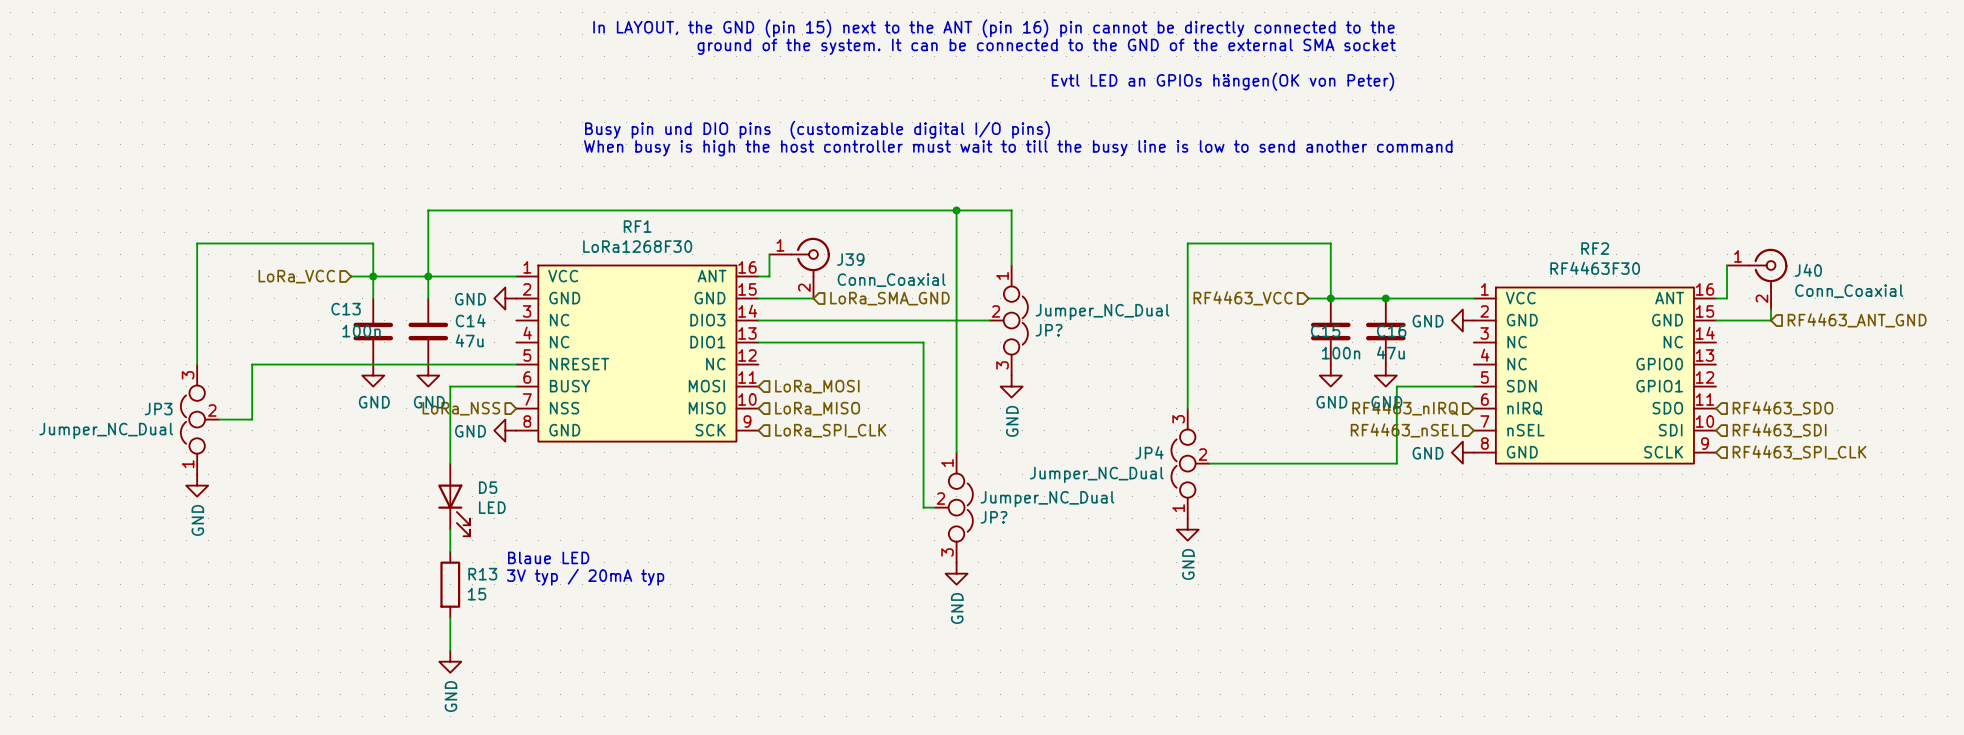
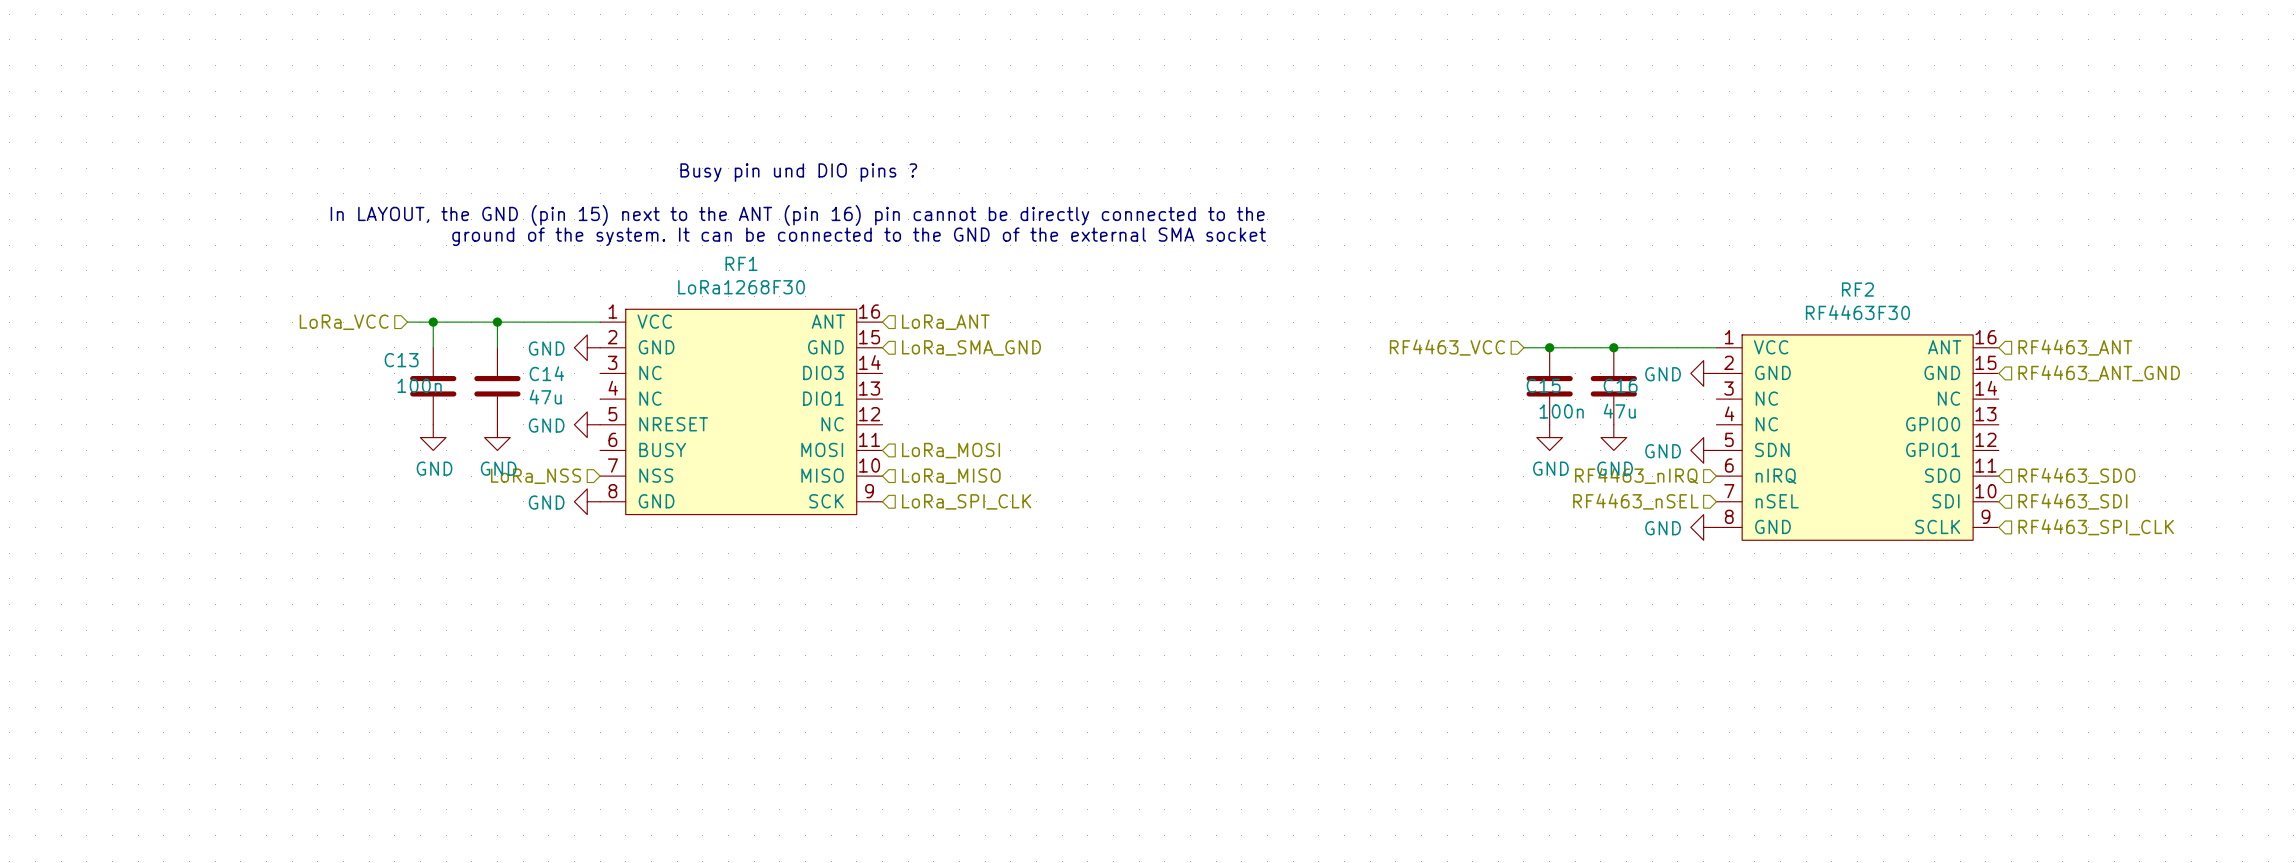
text: In LAYOUT, the GND (pin 15) next to the ANT (pin 16) pin cannot be directly connected to the (993, 28) -> none
text: ground of the system. It can be connected to the GND of the external SMA socket (1046, 46) -> none
text: Evtl LED an GPIOs hängen(OK von Peter) (1223, 81) -> none
text: Busy pin und DIO pins (customizable digital I/O pins) (817, 130) -> none
text: When busy is high the host controller must wait to till the busy line is low to send another command (1018, 148) -> Busy pin und DIO pins ? (798, 172)
text: none -> In LAYOUT, the GND (pin 15) next to the ANT (pin 16) pin cannot be directly connected to the (797, 215)
text: none -> ground of the system. It can be connected to the GND of the external SMA socket (859, 236)
wire: (956, 210) (956, 452) -> none
junction: (956, 210) -> none
wire: (769, 254) (769, 276) (758, 276) -> none
wire: (1011, 265) (1011, 210) (428, 210) (428, 276) -> none
wire: (1727, 265) (1727, 298) (1716, 298) -> none
J39: Conn_Coaxial (799, 268) -> none
wire: (373, 276) (373, 243) (197, 243) (197, 364) -> none
hierarchical label: none -> LoRa_ANT (945, 322)
J40: Conn_Coaxial (1757, 279) -> none
wire: (758, 298) (813, 298) -> none
hierarchical label position: LoRa_SMA_GND (889, 298) -> LoRa_SMA_GND (971, 347)
wire: (1330, 298) (1330, 243) (1187, 243) (1187, 408) -> none
hierarchical label: none -> RF4463_ANT (2075, 347)
wire: (1771, 309) (1771, 320) (1716, 320) -> none
wire: (758, 320) (989, 320) -> none
JP?: Jumper_NC_Dual (1008, 320) -> none
hierarchical label position: RF4463_ANT_GND (1857, 320) -> RF4463_ANT_GND (2099, 373)
wire: (758, 342) (923, 342) (923, 507) (934, 507) -> none
power symbol: none -> GND (587, 424)
wire: (516, 364) (252, 364) (252, 419) (219, 419) -> none
wire: (516, 386) (450, 386) (450, 463) -> none
power symbol: GND (1011, 386) -> none
power symbol: none -> GND (1703, 450)
wire: (1473, 386) (1396, 386) (1396, 463) (1209, 463) -> none
JP3: Jumper_NC_Dual (200, 419) -> none
JP4: Jumper_NC_Dual (1190, 463) -> none
power symbol: GND (197, 485) -> none
D5: LED (454, 499) -> none
JP?: Jumper_NC_Dual (953, 507) -> none
wire: (450, 529) (450, 551) -> none
power symbol: GND (1187, 529) -> none
text: Blaue LED (548, 557) -> none
power symbol: GND (956, 573) -> none
text: 3V typ / 20mA typ (585, 577) -> none
R13: 15 (450, 584) -> none
wire: (450, 617) (450, 650) -> none
power symbol: GND (450, 661) -> none

